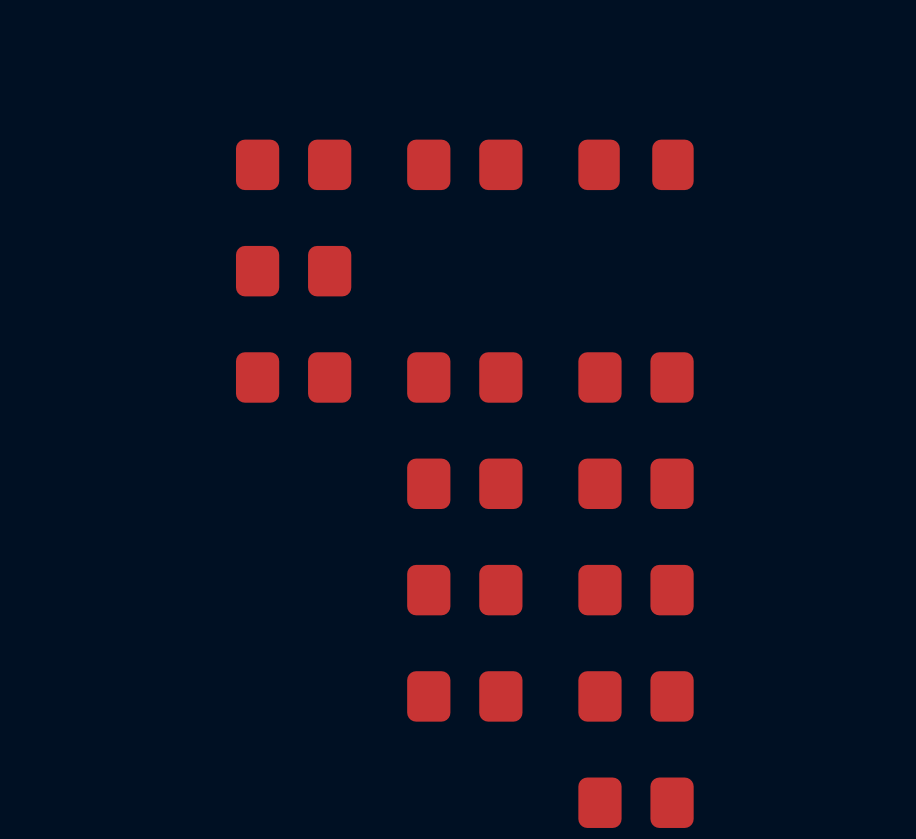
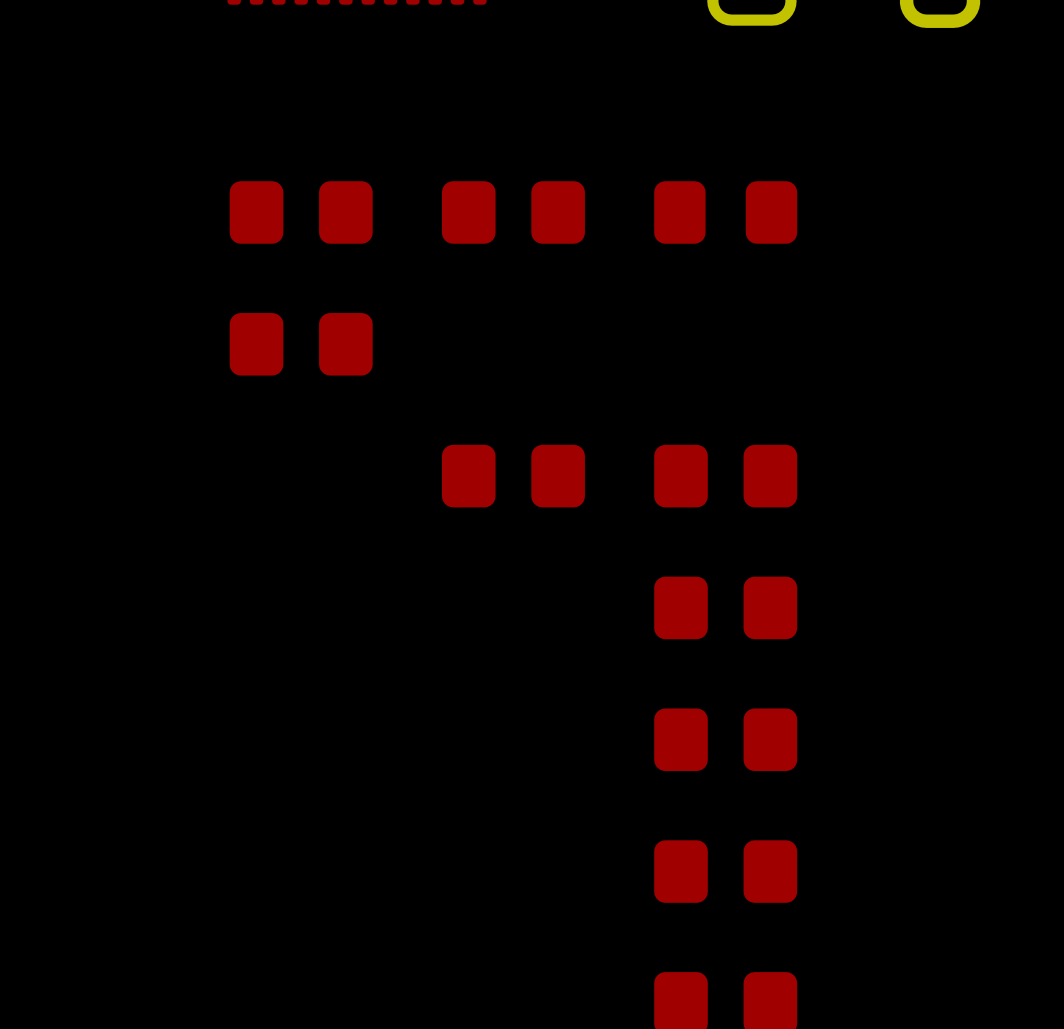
part: (293, 377) -> none
part: (464, 483) -> none
part: (464, 590) -> none
part: (464, 696) -> none

